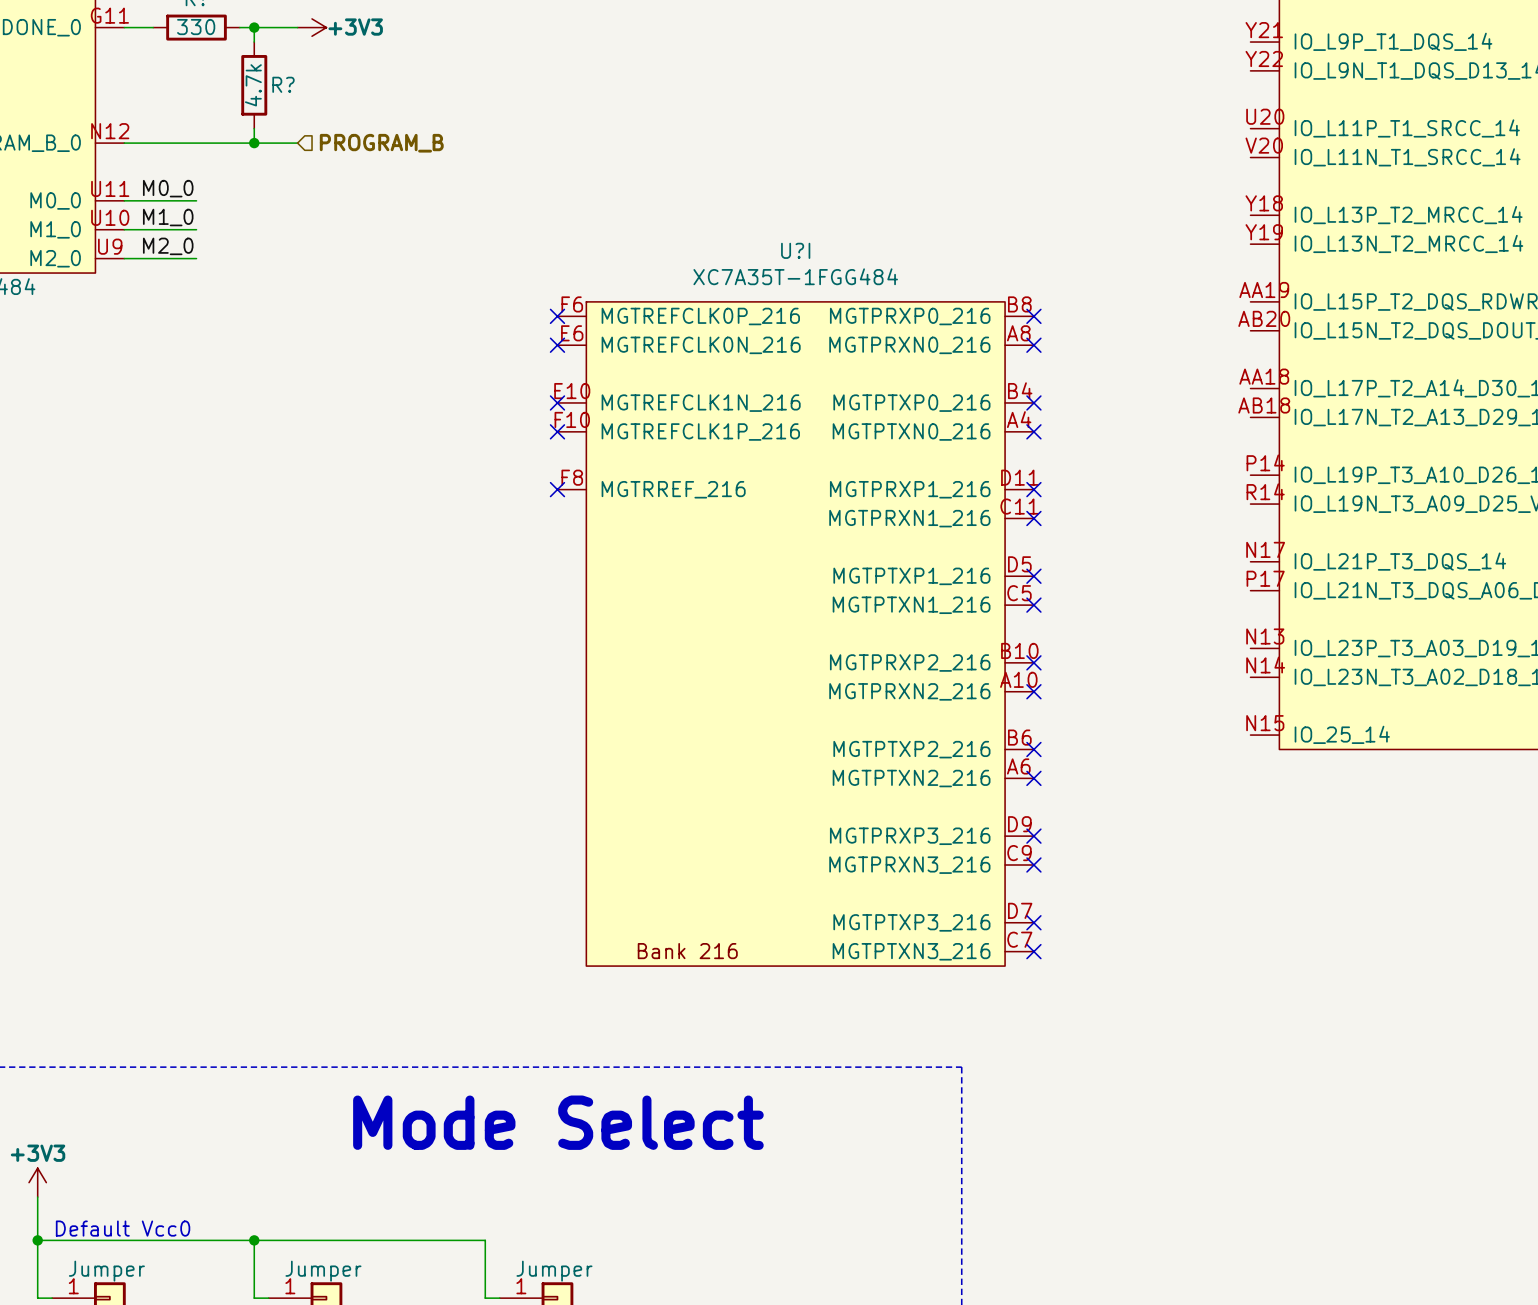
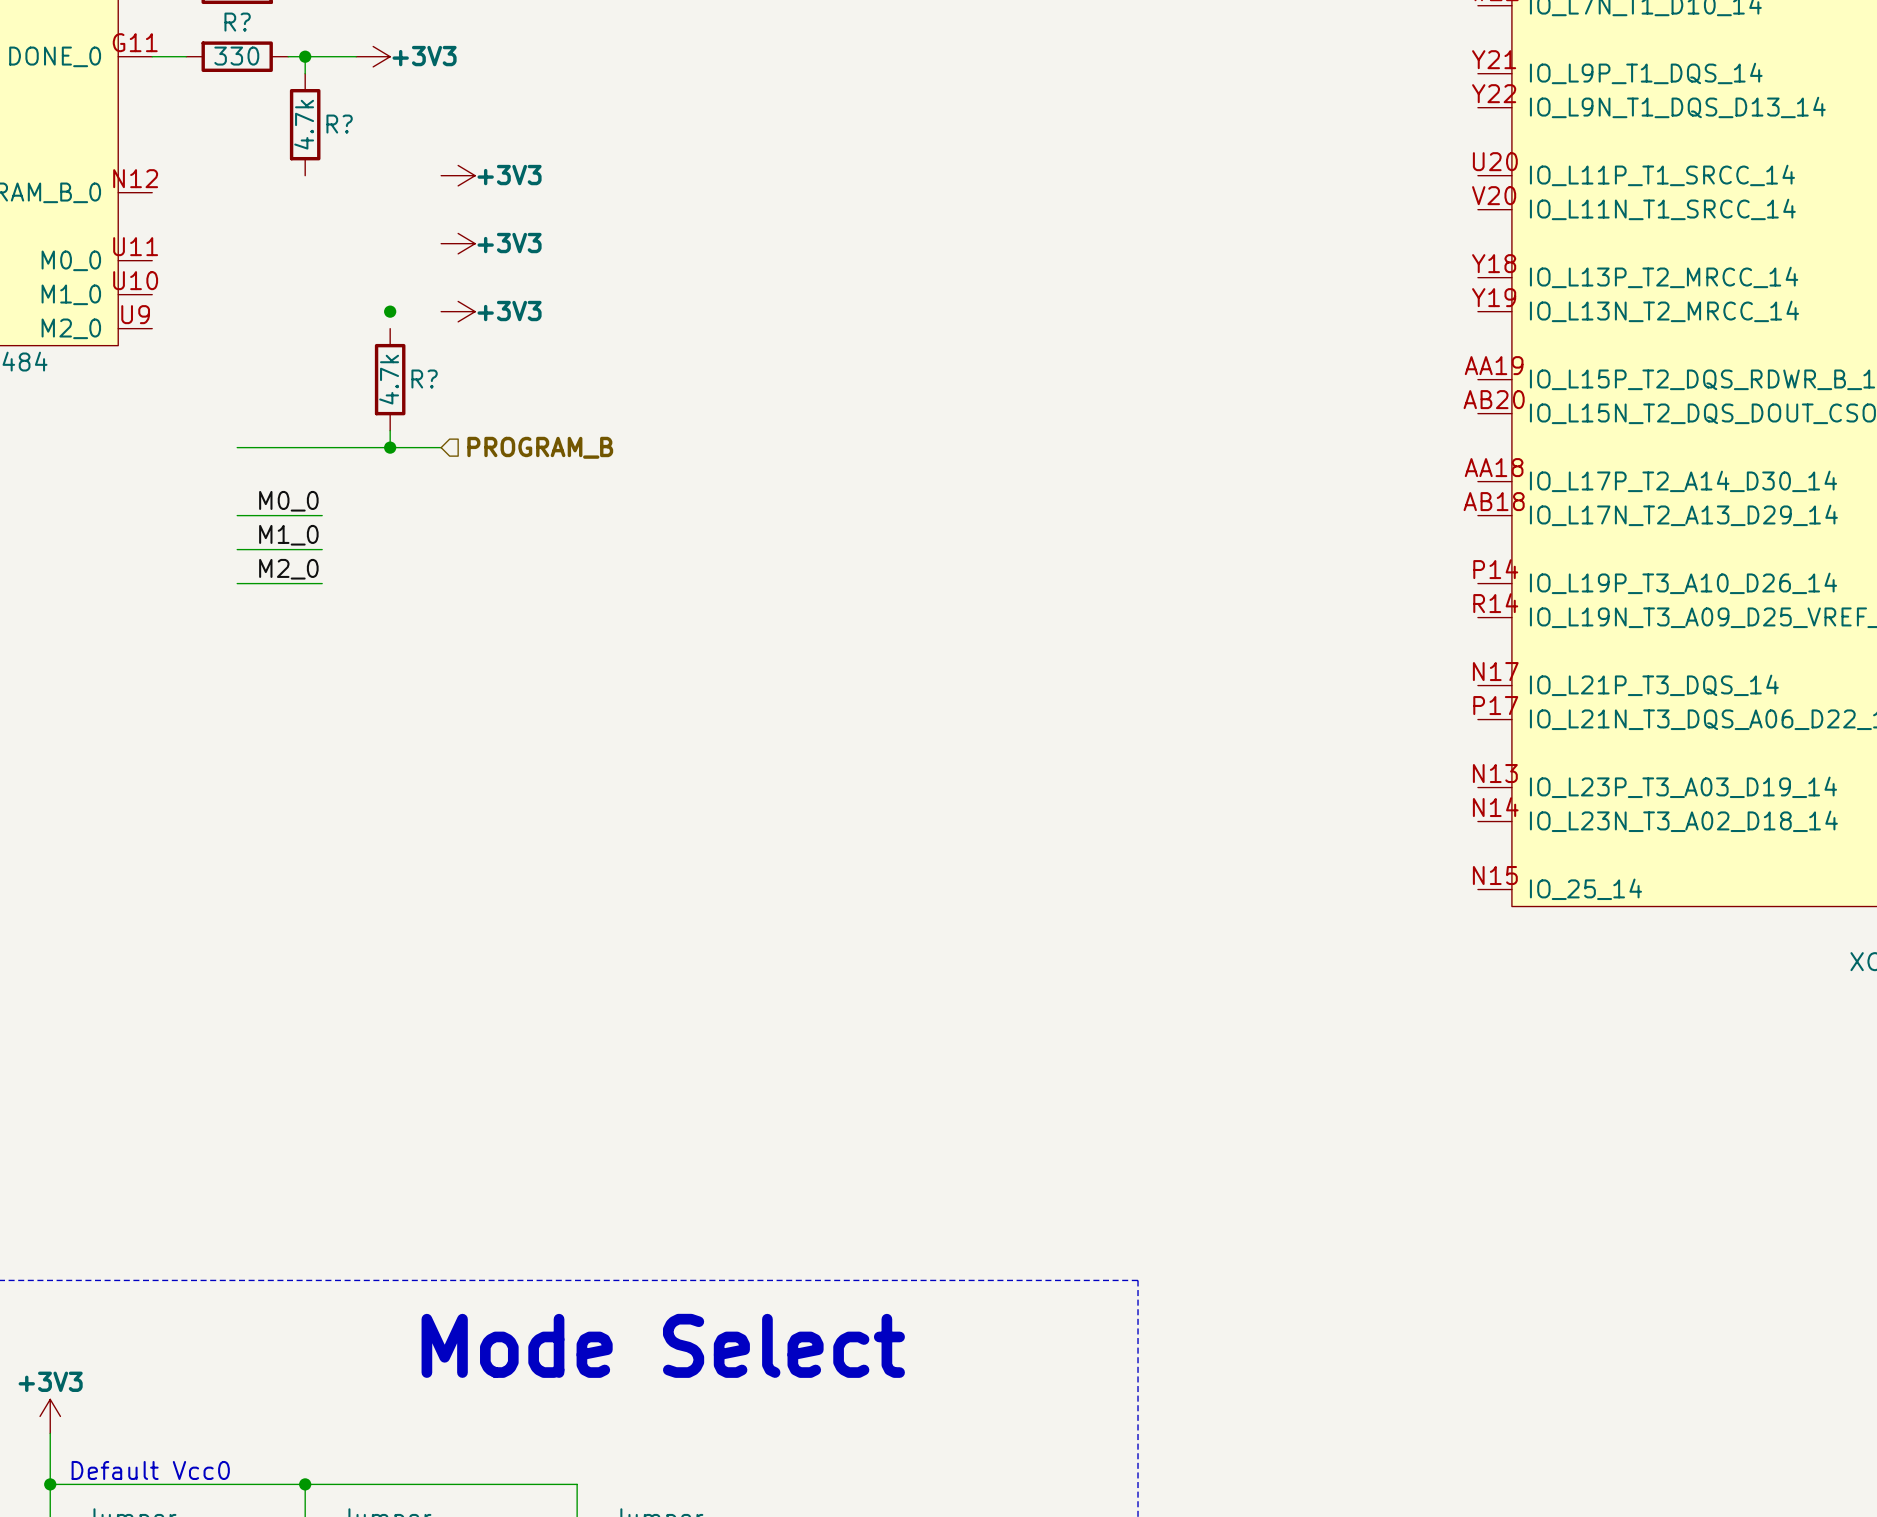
wire: (254, 128) (254, 143) -> (390, 430) (390, 447)
power symbol: none -> +3V3 (458, 175)
wire: (124, 143) (297, 143) -> (237, 447) (441, 447)
junction: (254, 143) -> none
hierarchical label position: PROGRAM_B (381, 143) -> PROGRAM_B (540, 447)
power symbol: none -> +3V3 (458, 243)
label position: M0_0 (168, 188) -> M0_0 (288, 501)
wire: (124, 200) (196, 200) -> (237, 515) (322, 515)
label position: M1_0 (168, 217) -> M1_0 (288, 535)
wire: (124, 229) (196, 229) -> (237, 549) (322, 549)
junction: none -> (390, 311)
power symbol: none -> +3V3 (458, 311)
label position: M2_0 (168, 246) -> M2_0 (288, 569)
wire: (124, 258) (196, 258) -> (237, 583) (322, 583)
R?: none -> 4.7k (390, 379)
no-connect mark: (557, 316) -> none
no-connect mark: (1033, 316) -> none
no-connect mark: (557, 345) -> none
no-connect mark: (1033, 345) -> none
junction: none -> (390, 447)
no-connect mark: (557, 402) -> none
no-connect mark: (1033, 402) -> none
no-connect mark: (557, 431) -> none
no-connect mark: (1033, 431) -> none
no-connect mark: (557, 489) -> none
no-connect mark: (1033, 489) -> none
no-connect mark: (1033, 518) -> none
no-connect mark: (1033, 576) -> none
no-connect mark: (1033, 605) -> none
U?I: XC7A35T-1FGG484 (795, 633) -> none
no-connect mark: (1033, 662) -> none
no-connect mark: (1033, 691) -> none
no-connect mark: (1033, 749) -> none
no-connect mark: (1033, 778) -> none
no-connect mark: (1033, 836) -> none
no-connect mark: (1033, 865) -> none
no-connect mark: (1033, 922) -> none
no-connect mark: (1033, 951) -> none

